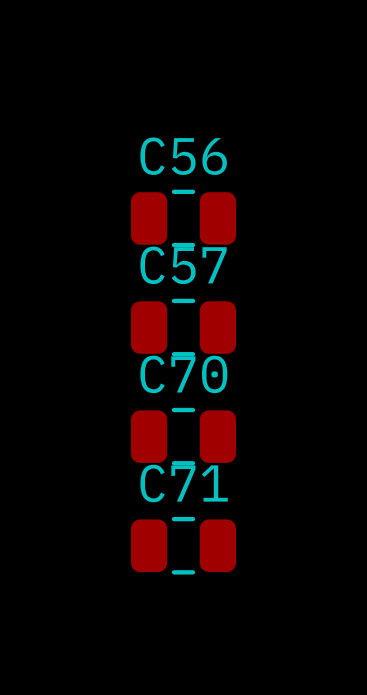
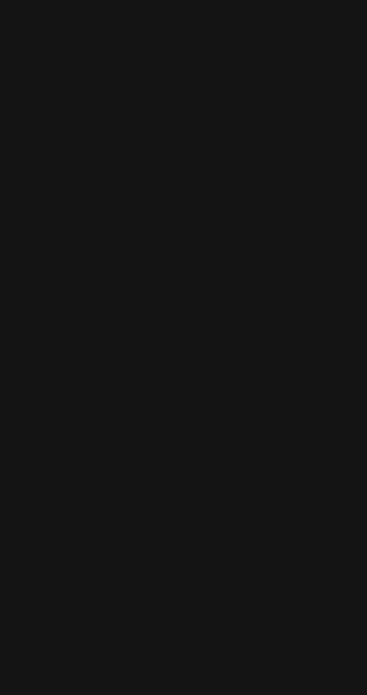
C56: (183, 218) -> none
C57: (183, 327) -> none
C70: (183, 436) -> none
C71: (183, 545) -> none

